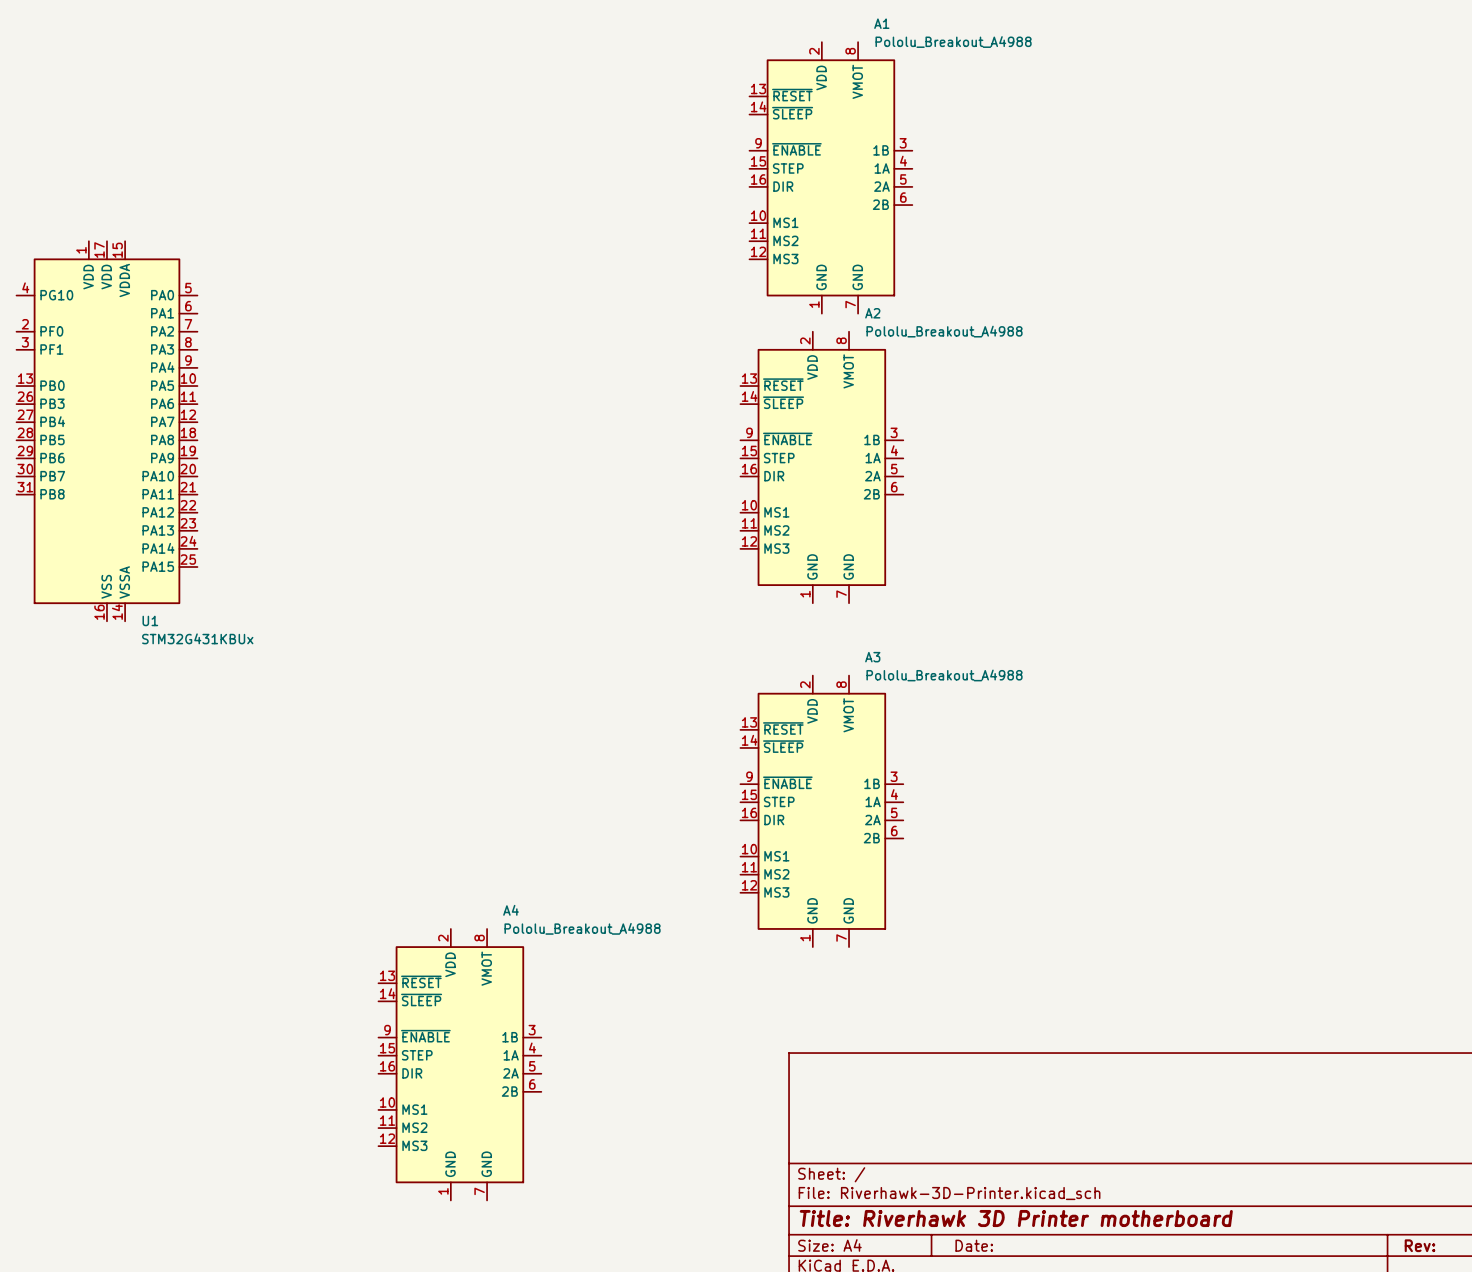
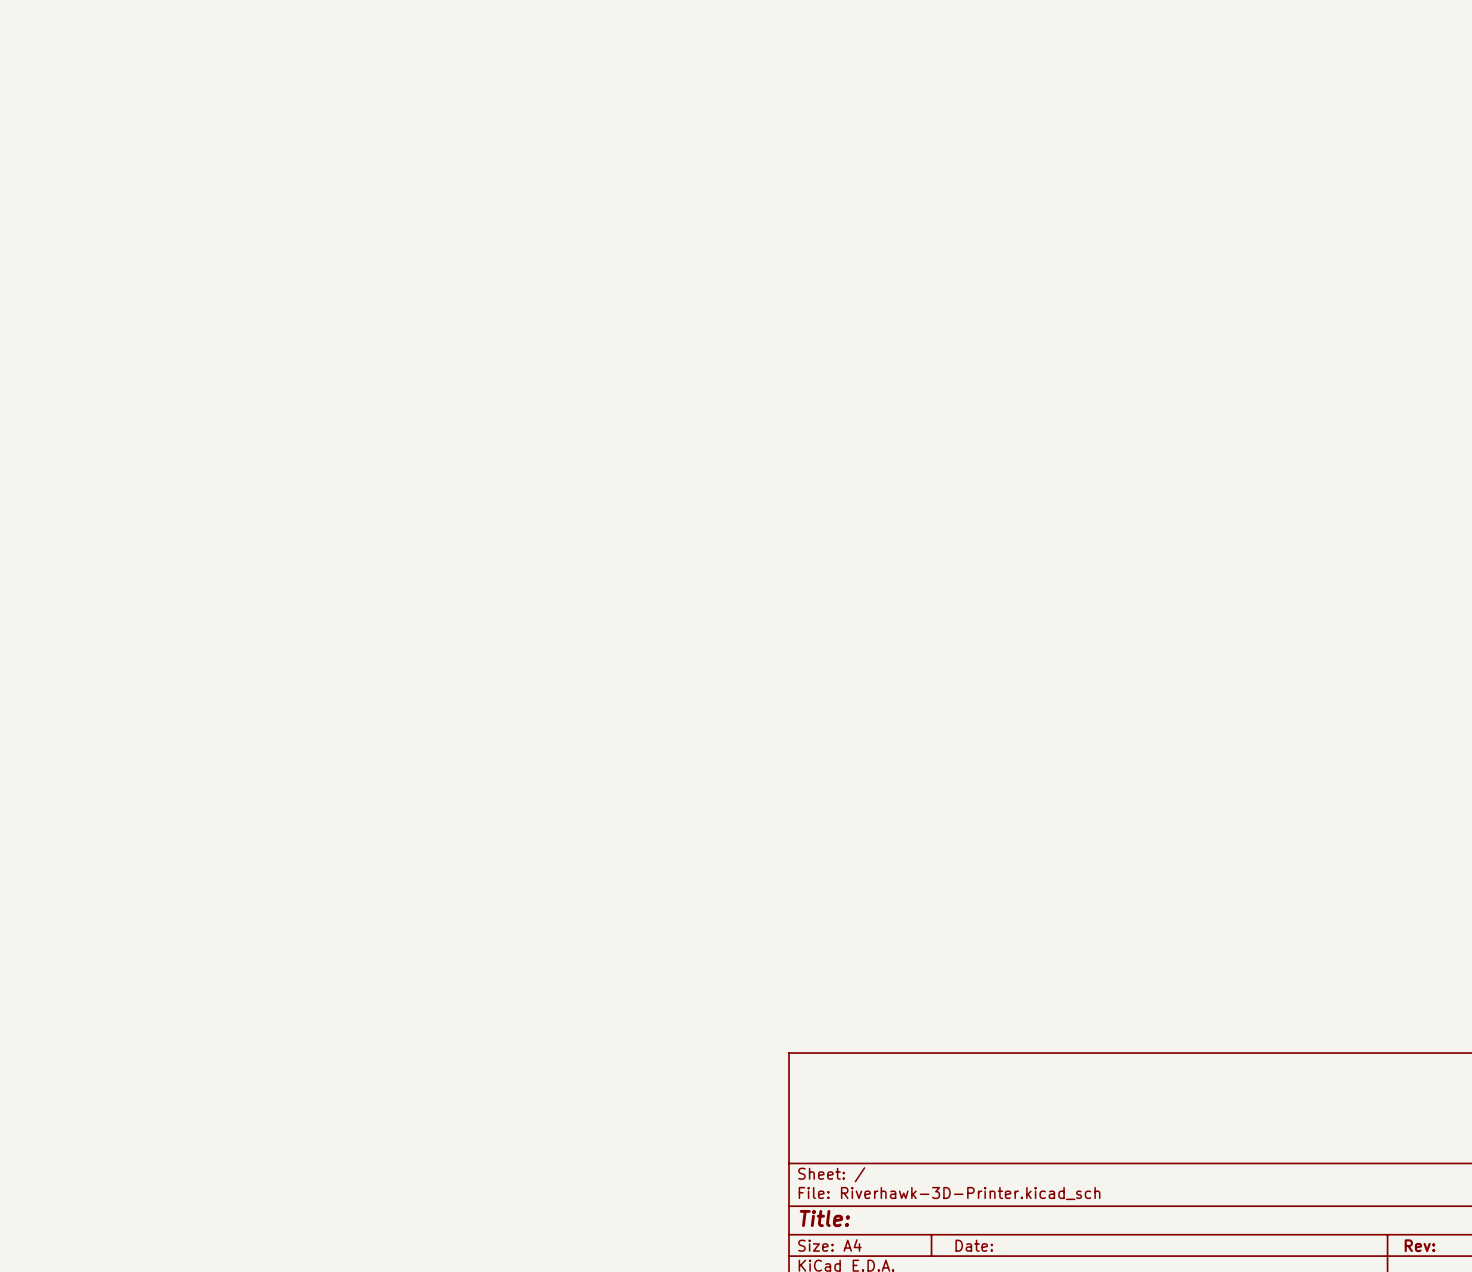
A1: Pololu_Breakout_A4988 (830, 177) -> none
U1: STM32G431KBUx (106, 431) -> none
A2: Pololu_Breakout_A4988 (821, 467) -> none
A3: Pololu_Breakout_A4988 (821, 811) -> none
A4: Pololu_Breakout_A4988 (459, 1064) -> none
title block: Title: Riverhawk 3D Printer motherboard (1016, 1218) -> Title: (824, 1218)

